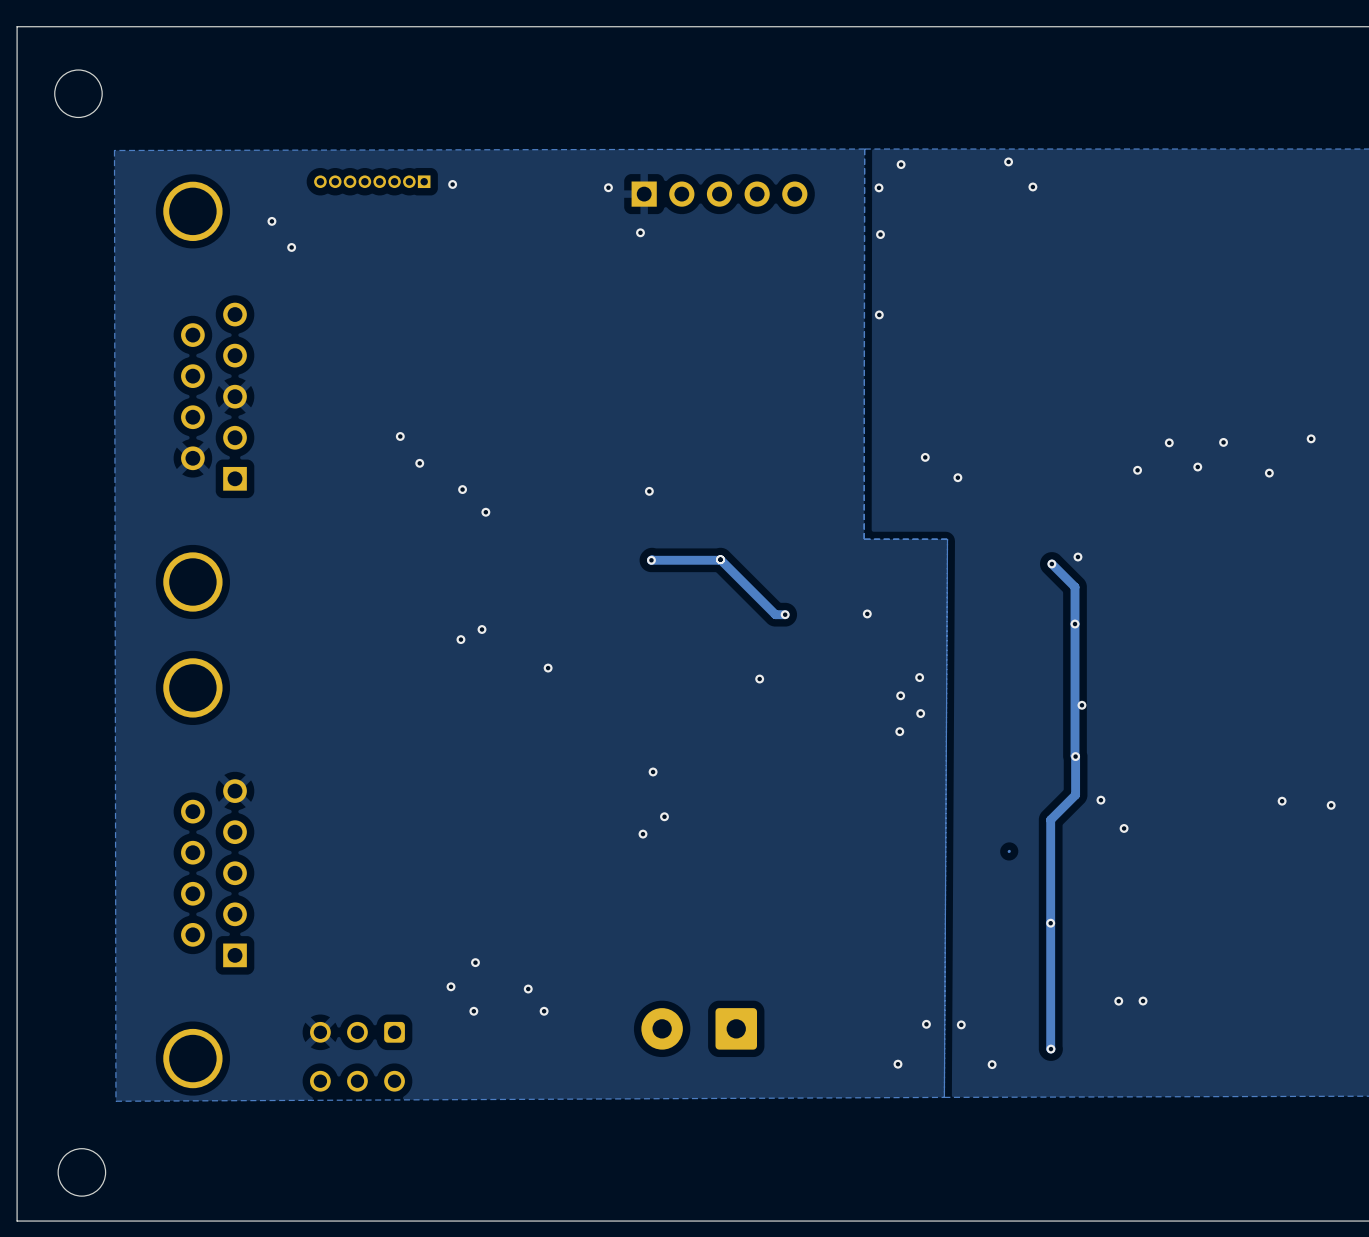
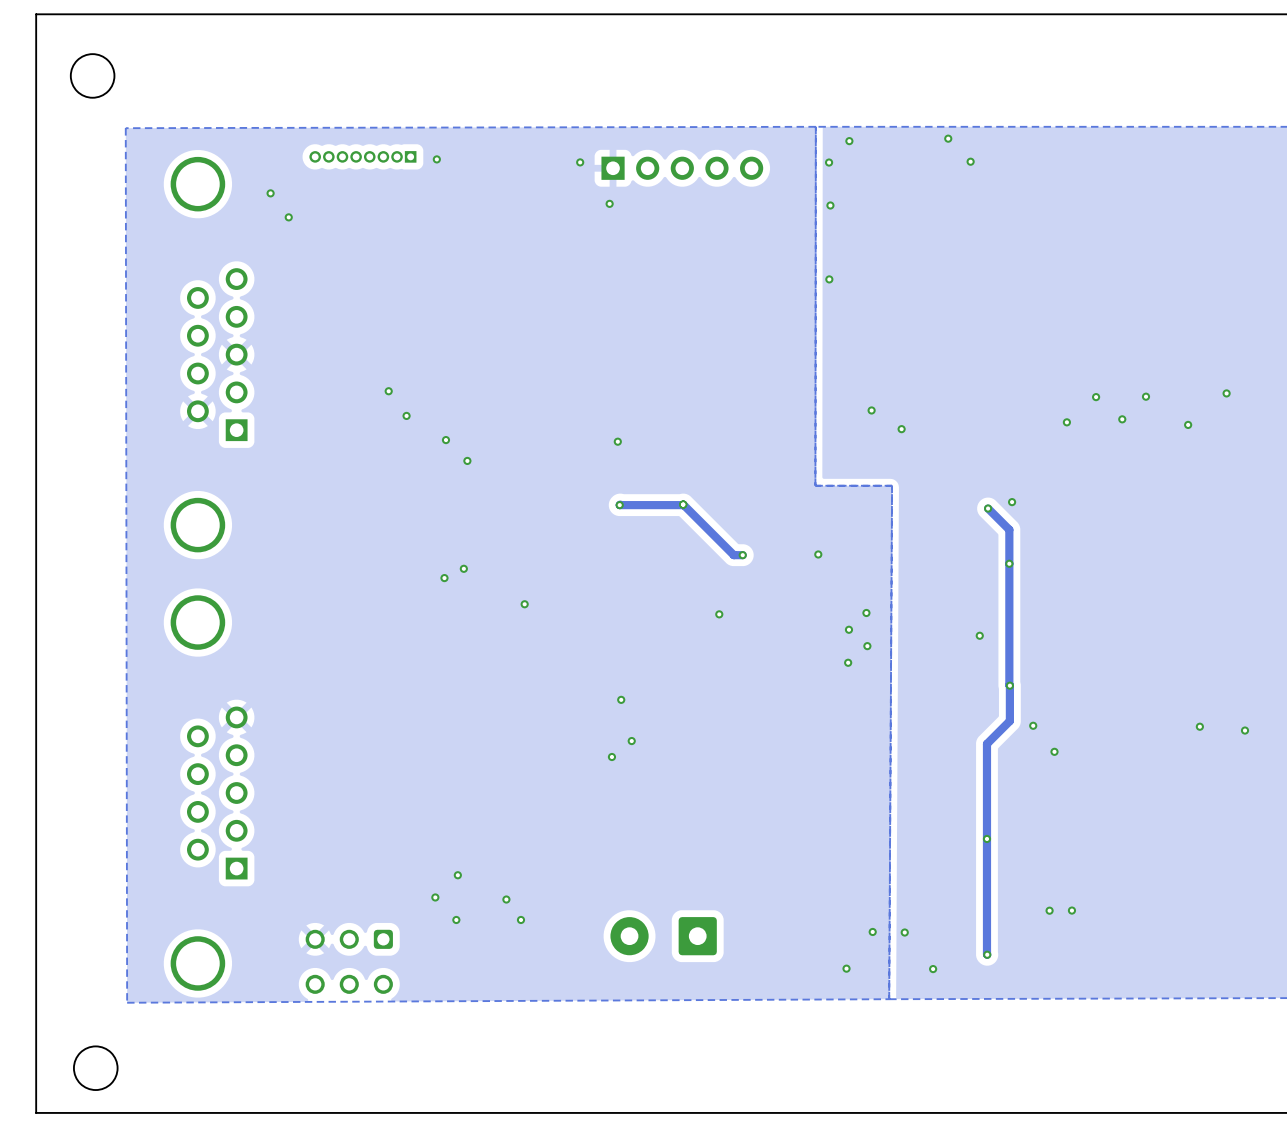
via position: (1081, 705) -> (979, 635)
track: (1009, 851) (1009, 851) -> none

